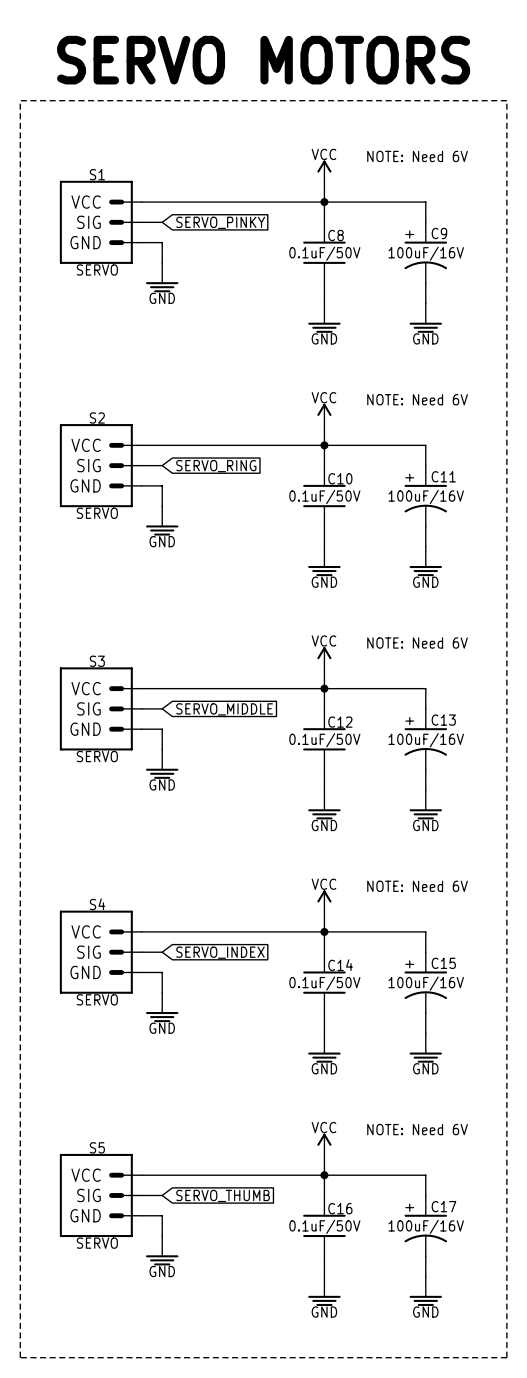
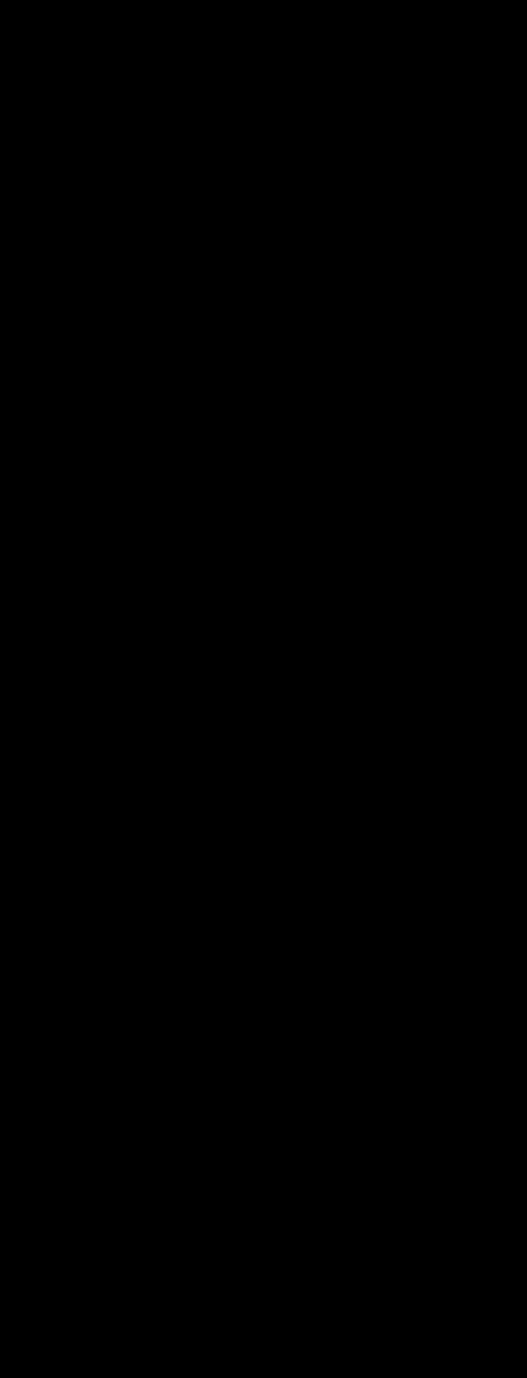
text: SERVO MOTORS (263, 60) -> none
line: (20, 100) (20, 1357) (506, 1357) (506, 100) (20, 100) -> none
text: NOTE: Need 6V (417, 156) -> none
power symbol: (324, 171) -> none
wire: (324, 181) (324, 222) -> none
wire: (141, 202) (425, 202) (425, 222) -> none
junction: (324, 202) -> none
S1: (100, 222) -> none
wire: (141, 222) (162, 222) -> none
global label: SERVO_PINKY (220, 222) -> none
wire: (141, 242) (162, 242) (162, 262) -> none
C8: (324, 252) -> none
C9: (425, 252) -> none
power symbol: (162, 277) -> none
wire: (324, 283) (324, 303) -> none
wire: (425, 283) (425, 303) -> none
power symbol: (324, 318) -> none
power symbol: (425, 318) -> none
text: NOTE: Need 6V (417, 399) -> none
power symbol: (324, 414) -> none
wire: (324, 425) (324, 465) -> none
wire: (141, 445) (425, 445) (425, 465) -> none
junction: (324, 445) -> none
S2: (100, 465) -> none
wire: (141, 465) (162, 465) -> none
global label: SERVO_RING (216, 466) -> none
wire: (141, 485) (162, 485) (162, 506) -> none
C10: (324, 496) -> none
C11: (425, 496) -> none
power symbol: (162, 520) -> none
wire: (324, 526) (324, 546) -> none
wire: (425, 526) (425, 546) -> none
power symbol: (324, 561) -> none
power symbol: (425, 561) -> none
text: NOTE: Need 6V (417, 643) -> none
power symbol: (324, 657) -> none
wire: (324, 668) (324, 708) -> none
wire: (141, 688) (425, 688) (425, 708) -> none
junction: (324, 688) -> none
S3: (100, 708) -> none
wire: (141, 708) (162, 708) -> none
global label: SERVO_MIDDLE (224, 709) -> none
wire: (141, 729) (162, 729) (162, 749) -> none
C12: (324, 739) -> none
C13: (425, 739) -> none
power symbol: (162, 764) -> none
wire: (324, 769) (324, 790) -> none
wire: (425, 769) (425, 790) -> none
power symbol: (324, 804) -> none
power symbol: (425, 804) -> none
text: NOTE: Need 6V (417, 886) -> none
power symbol: (324, 901) -> none
wire: (324, 911) (324, 952) -> none
wire: (141, 931) (425, 931) (425, 952) -> none
junction: (324, 931) -> none
S4: (100, 952) -> none
wire: (141, 952) (162, 952) -> none
global label: SERVO_INDEX (220, 952) -> none
wire: (141, 972) (162, 972) (162, 992) -> none
C14: (324, 982) -> none
C15: (425, 982) -> none
power symbol: (162, 1007) -> none
wire: (324, 1013) (324, 1033) -> none
wire: (425, 1013) (425, 1033) -> none
power symbol: (324, 1047) -> none
power symbol: (425, 1047) -> none
text: NOTE: Need 6V (417, 1129) -> none
power symbol: (324, 1144) -> none
wire: (324, 1154) (324, 1195) -> none
wire: (141, 1175) (425, 1175) (425, 1195) -> none
junction: (324, 1175) -> none
S5: (100, 1195) -> none
wire: (141, 1195) (162, 1195) -> none
global label: SERVO_THUMB (223, 1195) -> none
wire: (141, 1215) (162, 1215) (162, 1236) -> none
C16: (324, 1225) -> none
C17: (425, 1225) -> none
power symbol: (162, 1250) -> none
wire: (324, 1256) (324, 1276) -> none
wire: (425, 1256) (425, 1276) -> none
power symbol: (324, 1291) -> none
power symbol: (425, 1291) -> none

